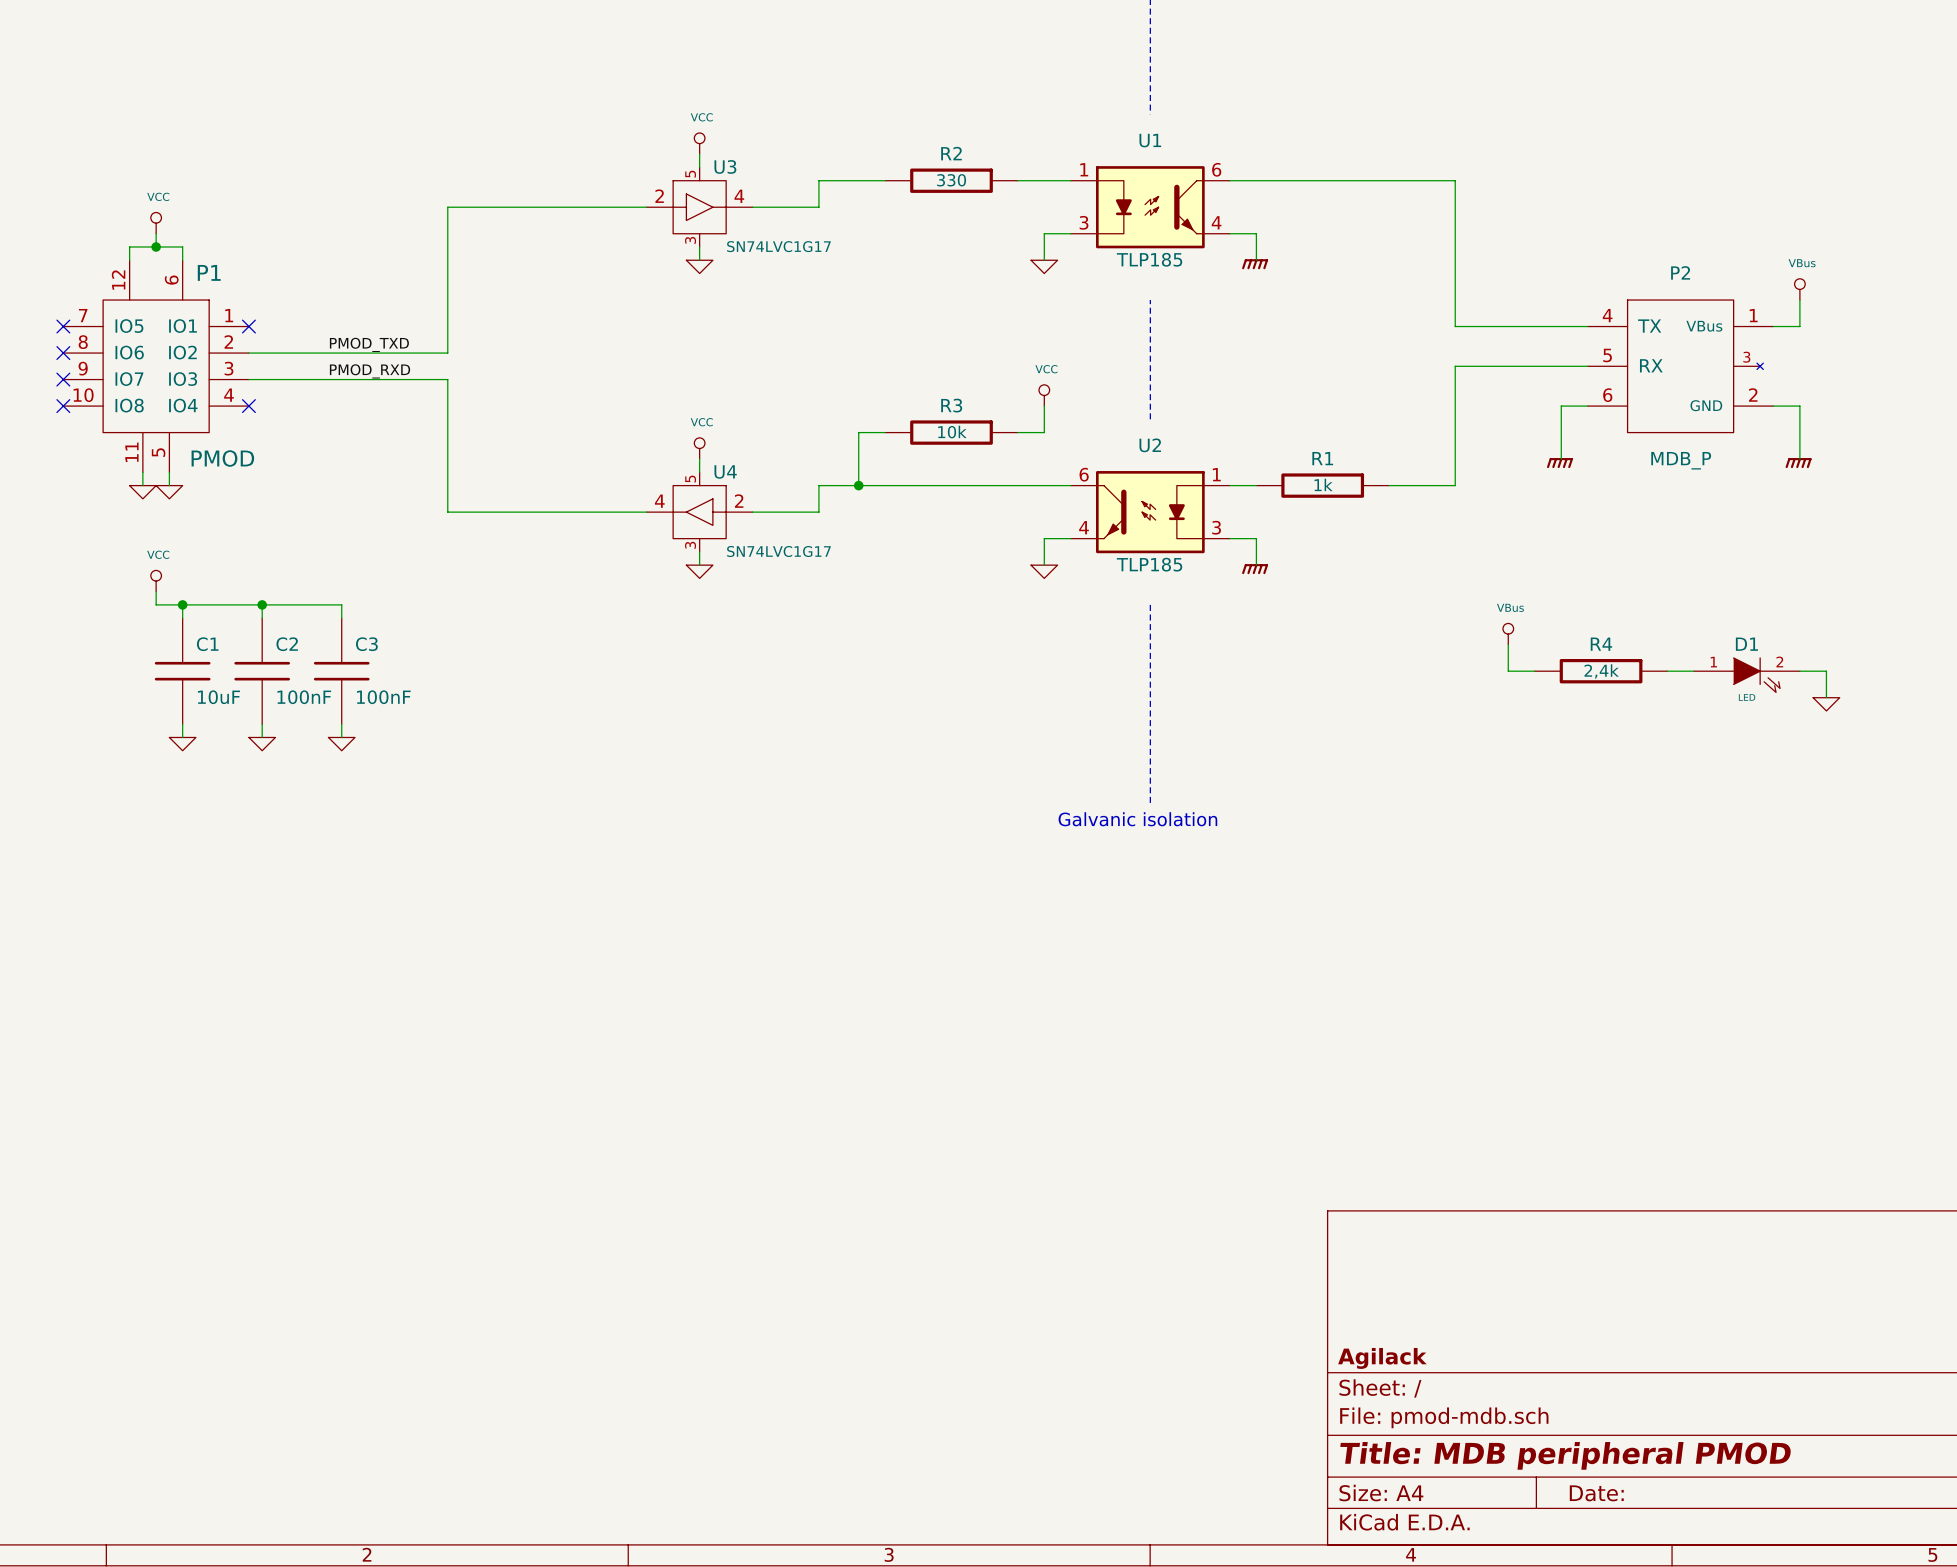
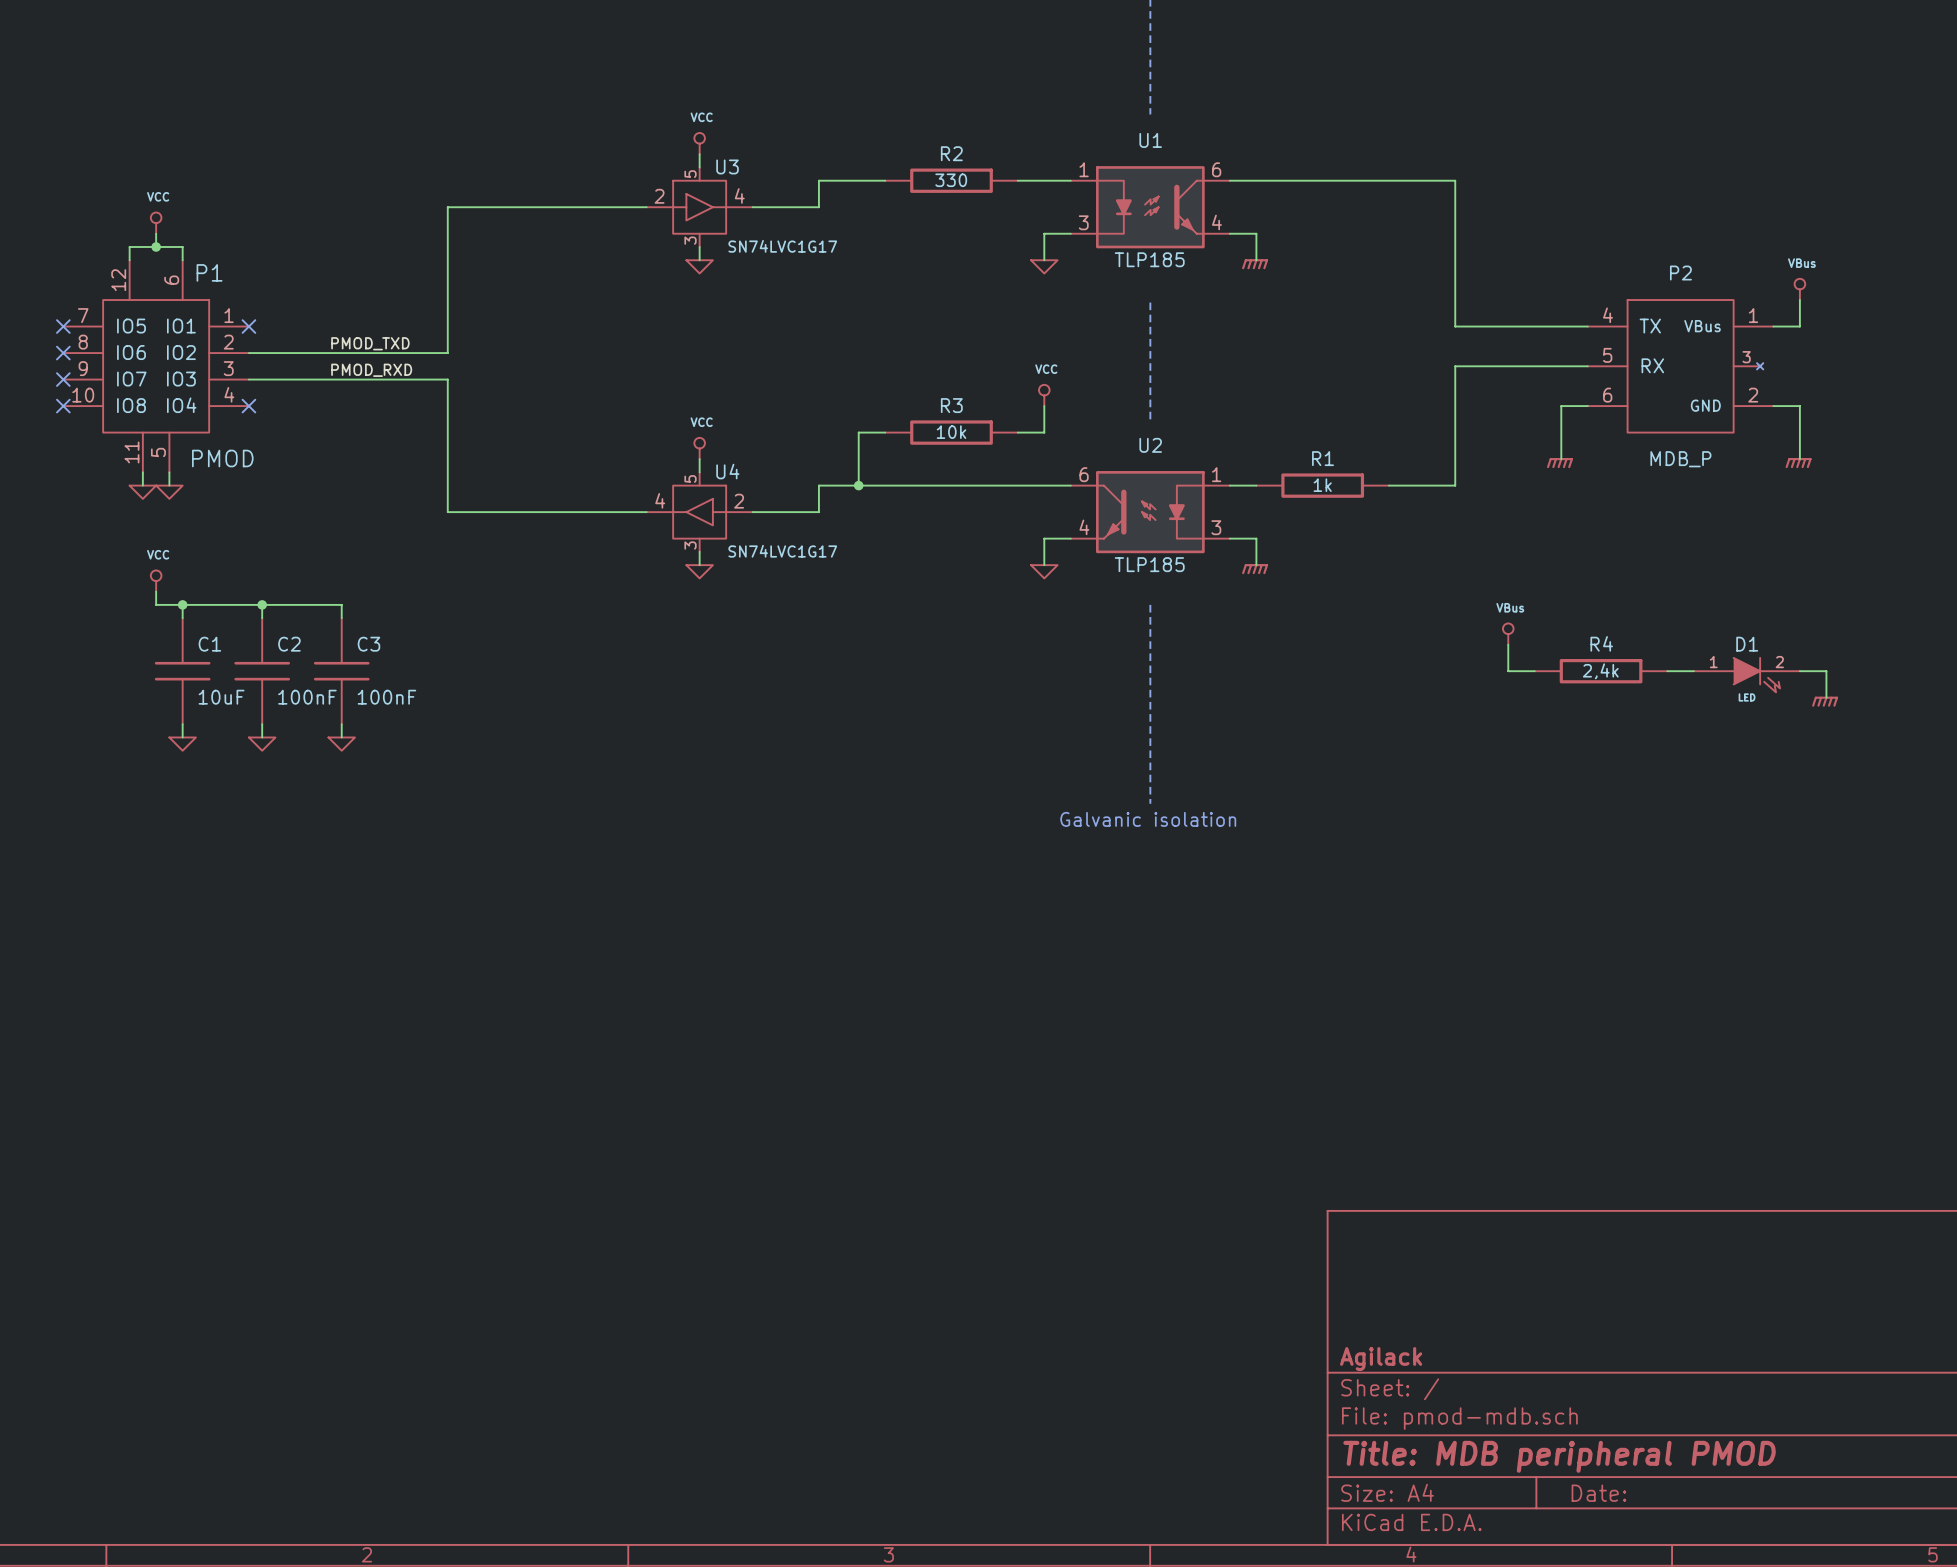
power symbol shape: [1813, 697, 1840, 711] -> [1812, 696, 1839, 707]

